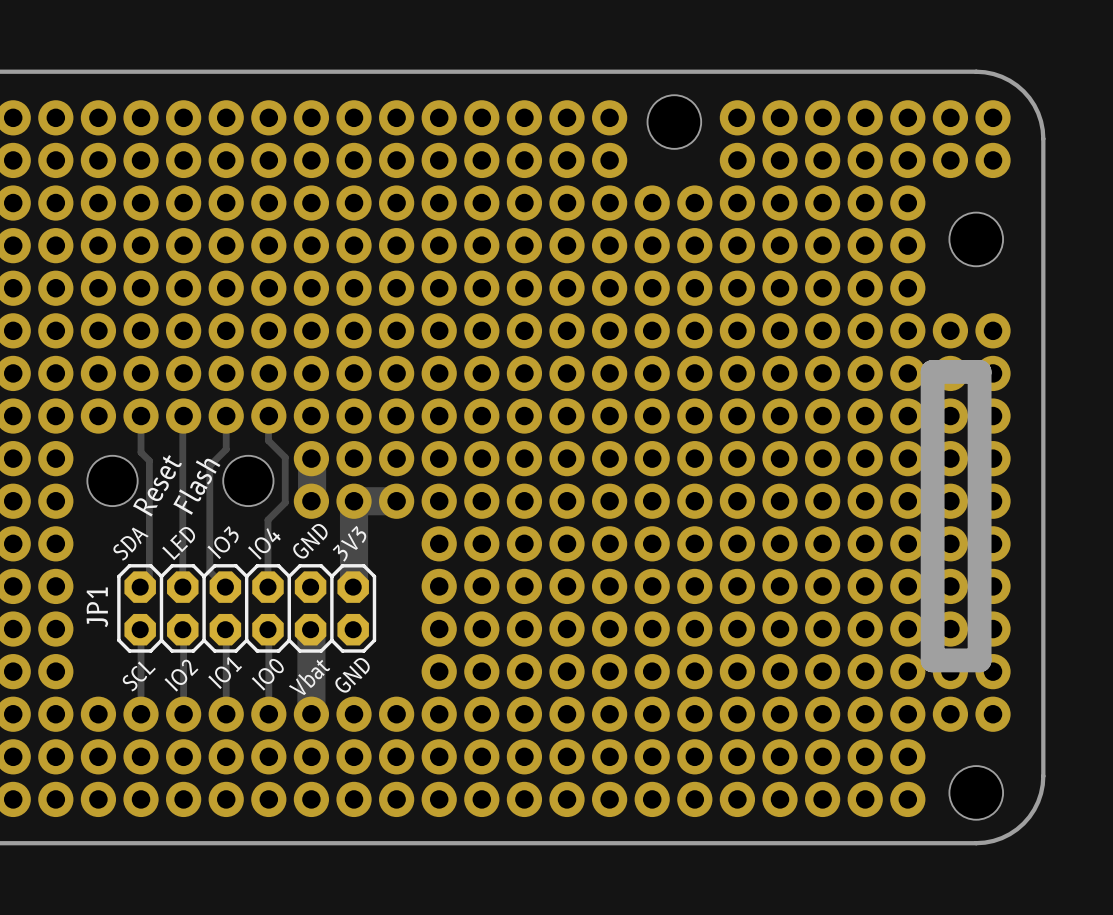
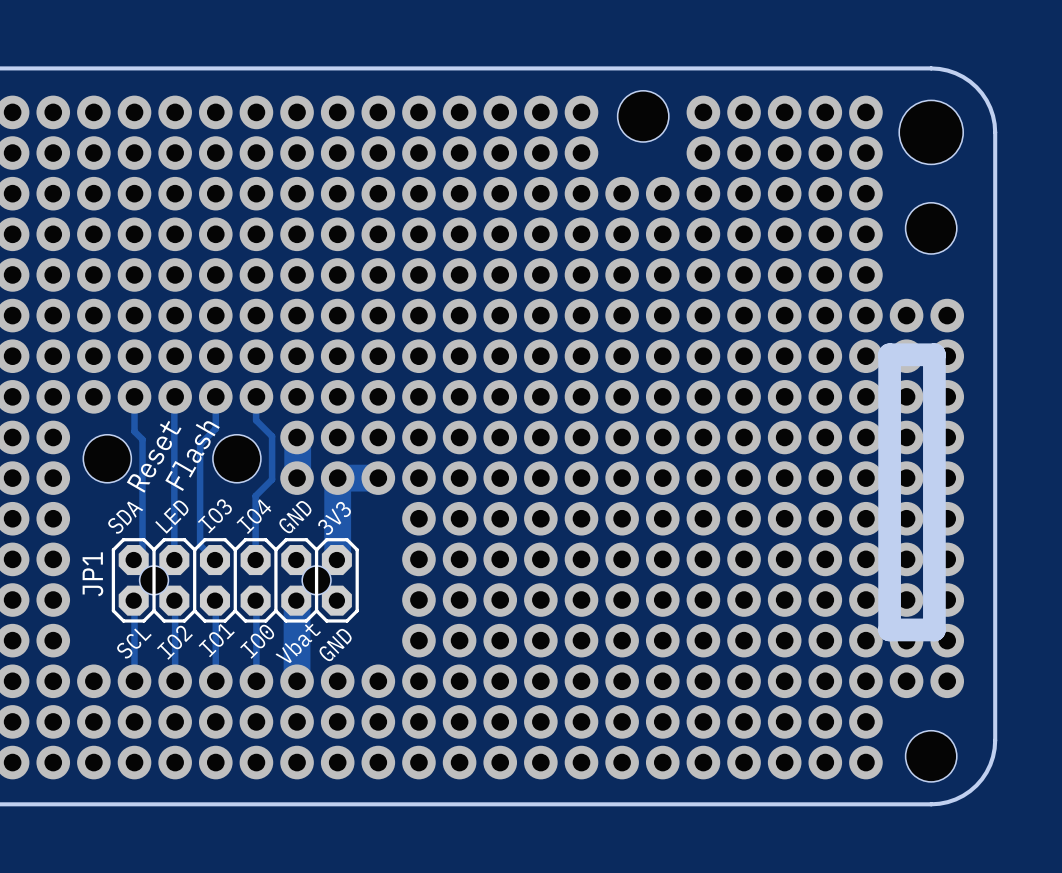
via: (950, 117) -> none
via: (993, 117) -> none
hole: none -> (931, 132)
via: (950, 160) -> none
via: (993, 160) -> none
hole: none -> (154, 580)
hole: none -> (316, 580)

